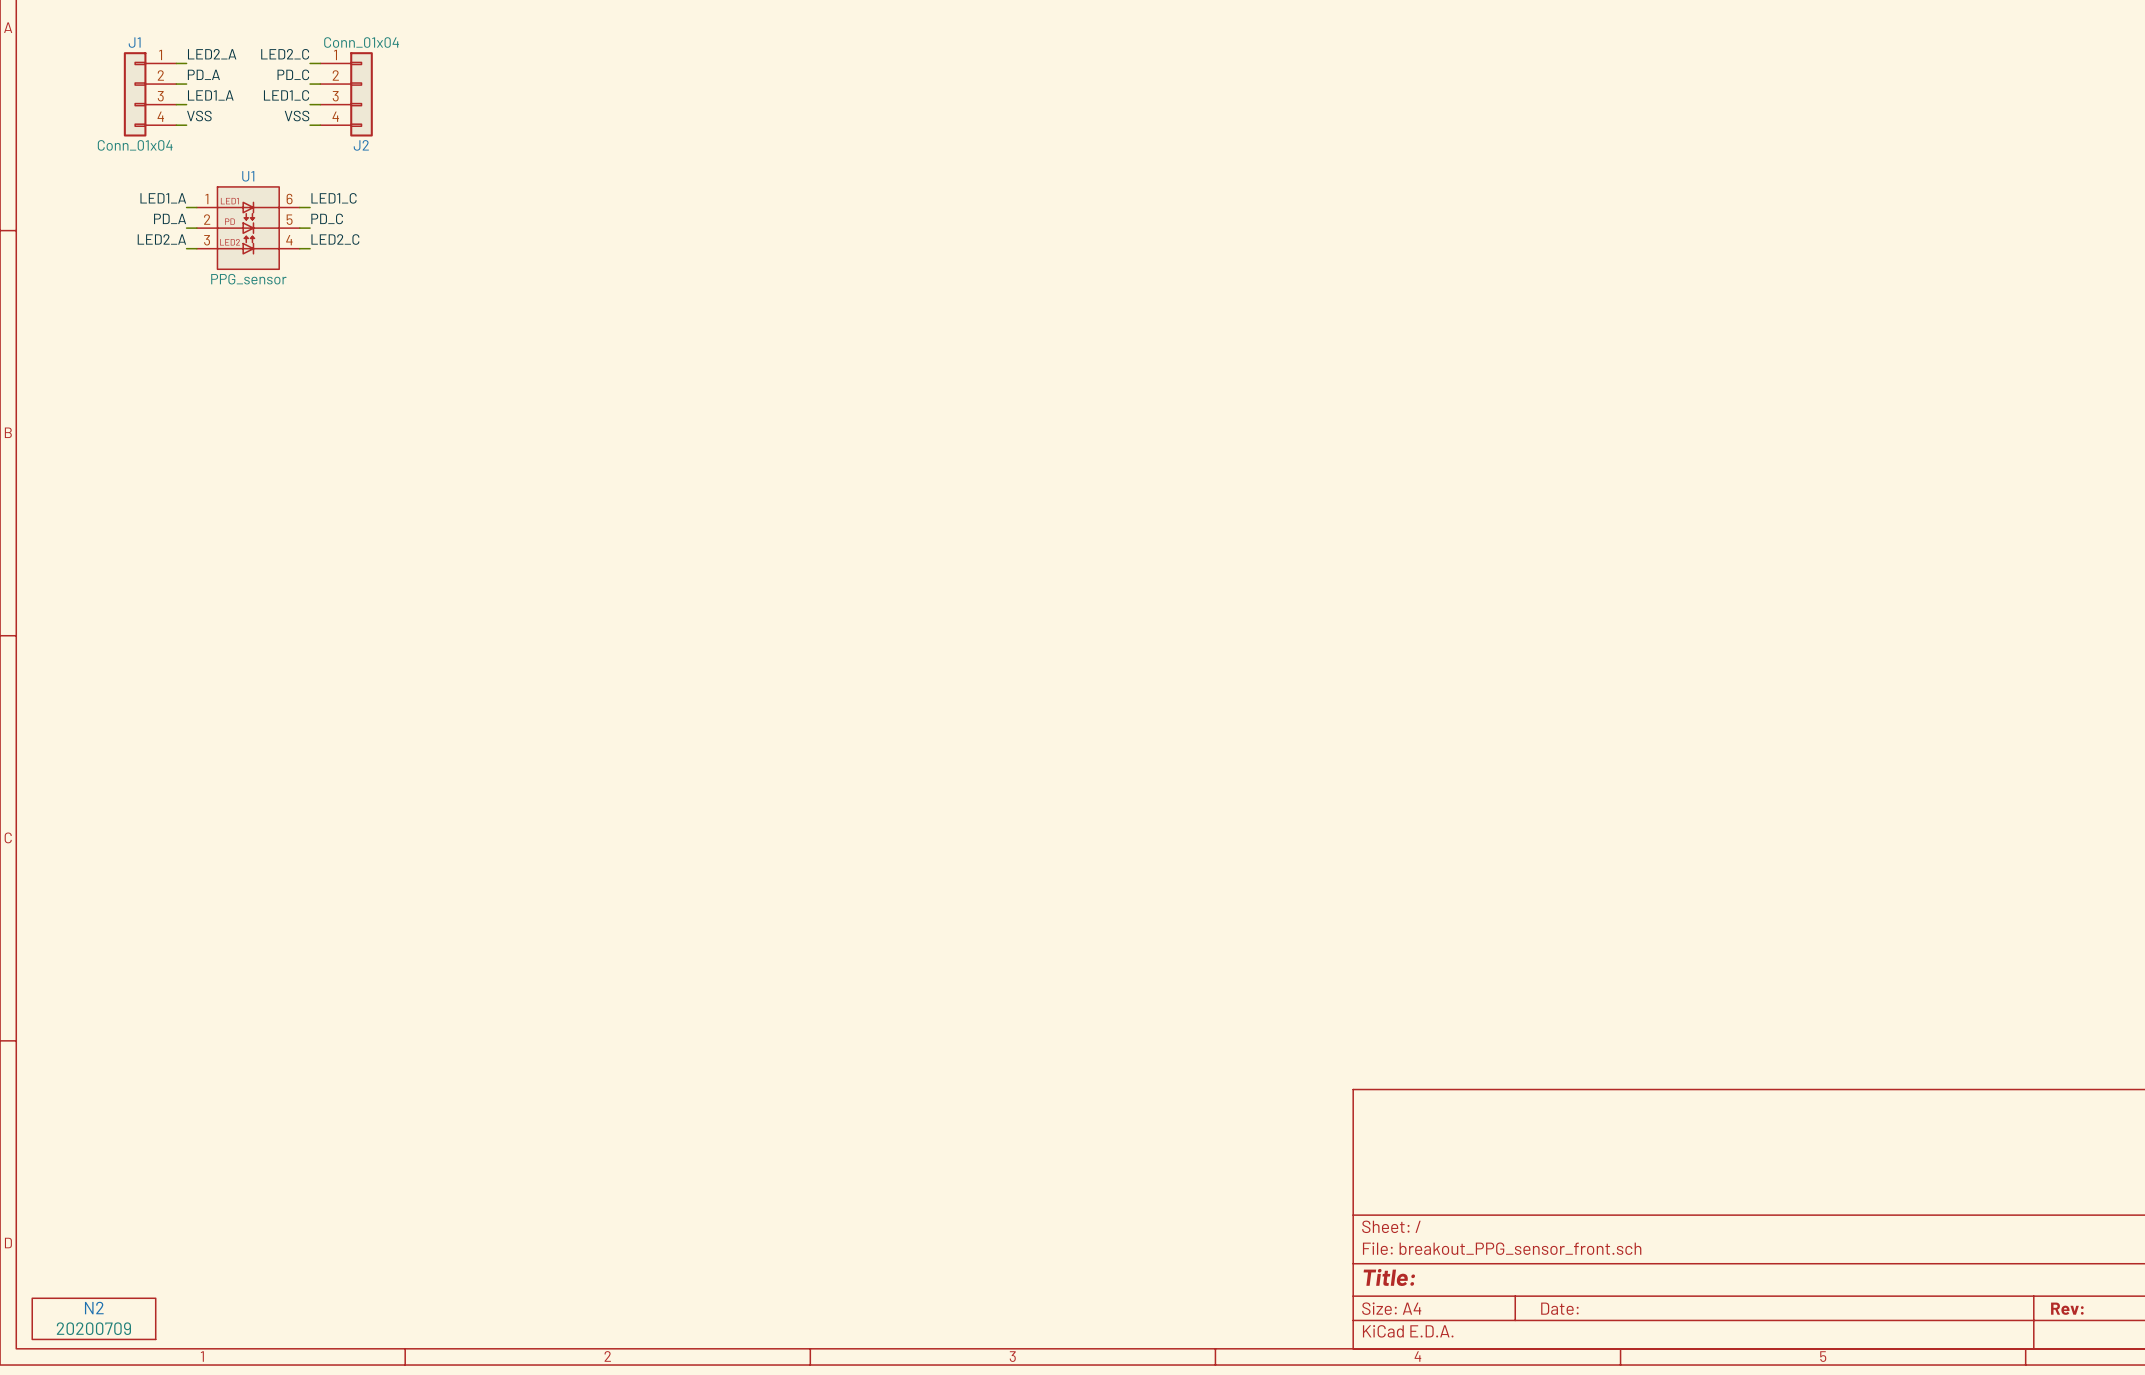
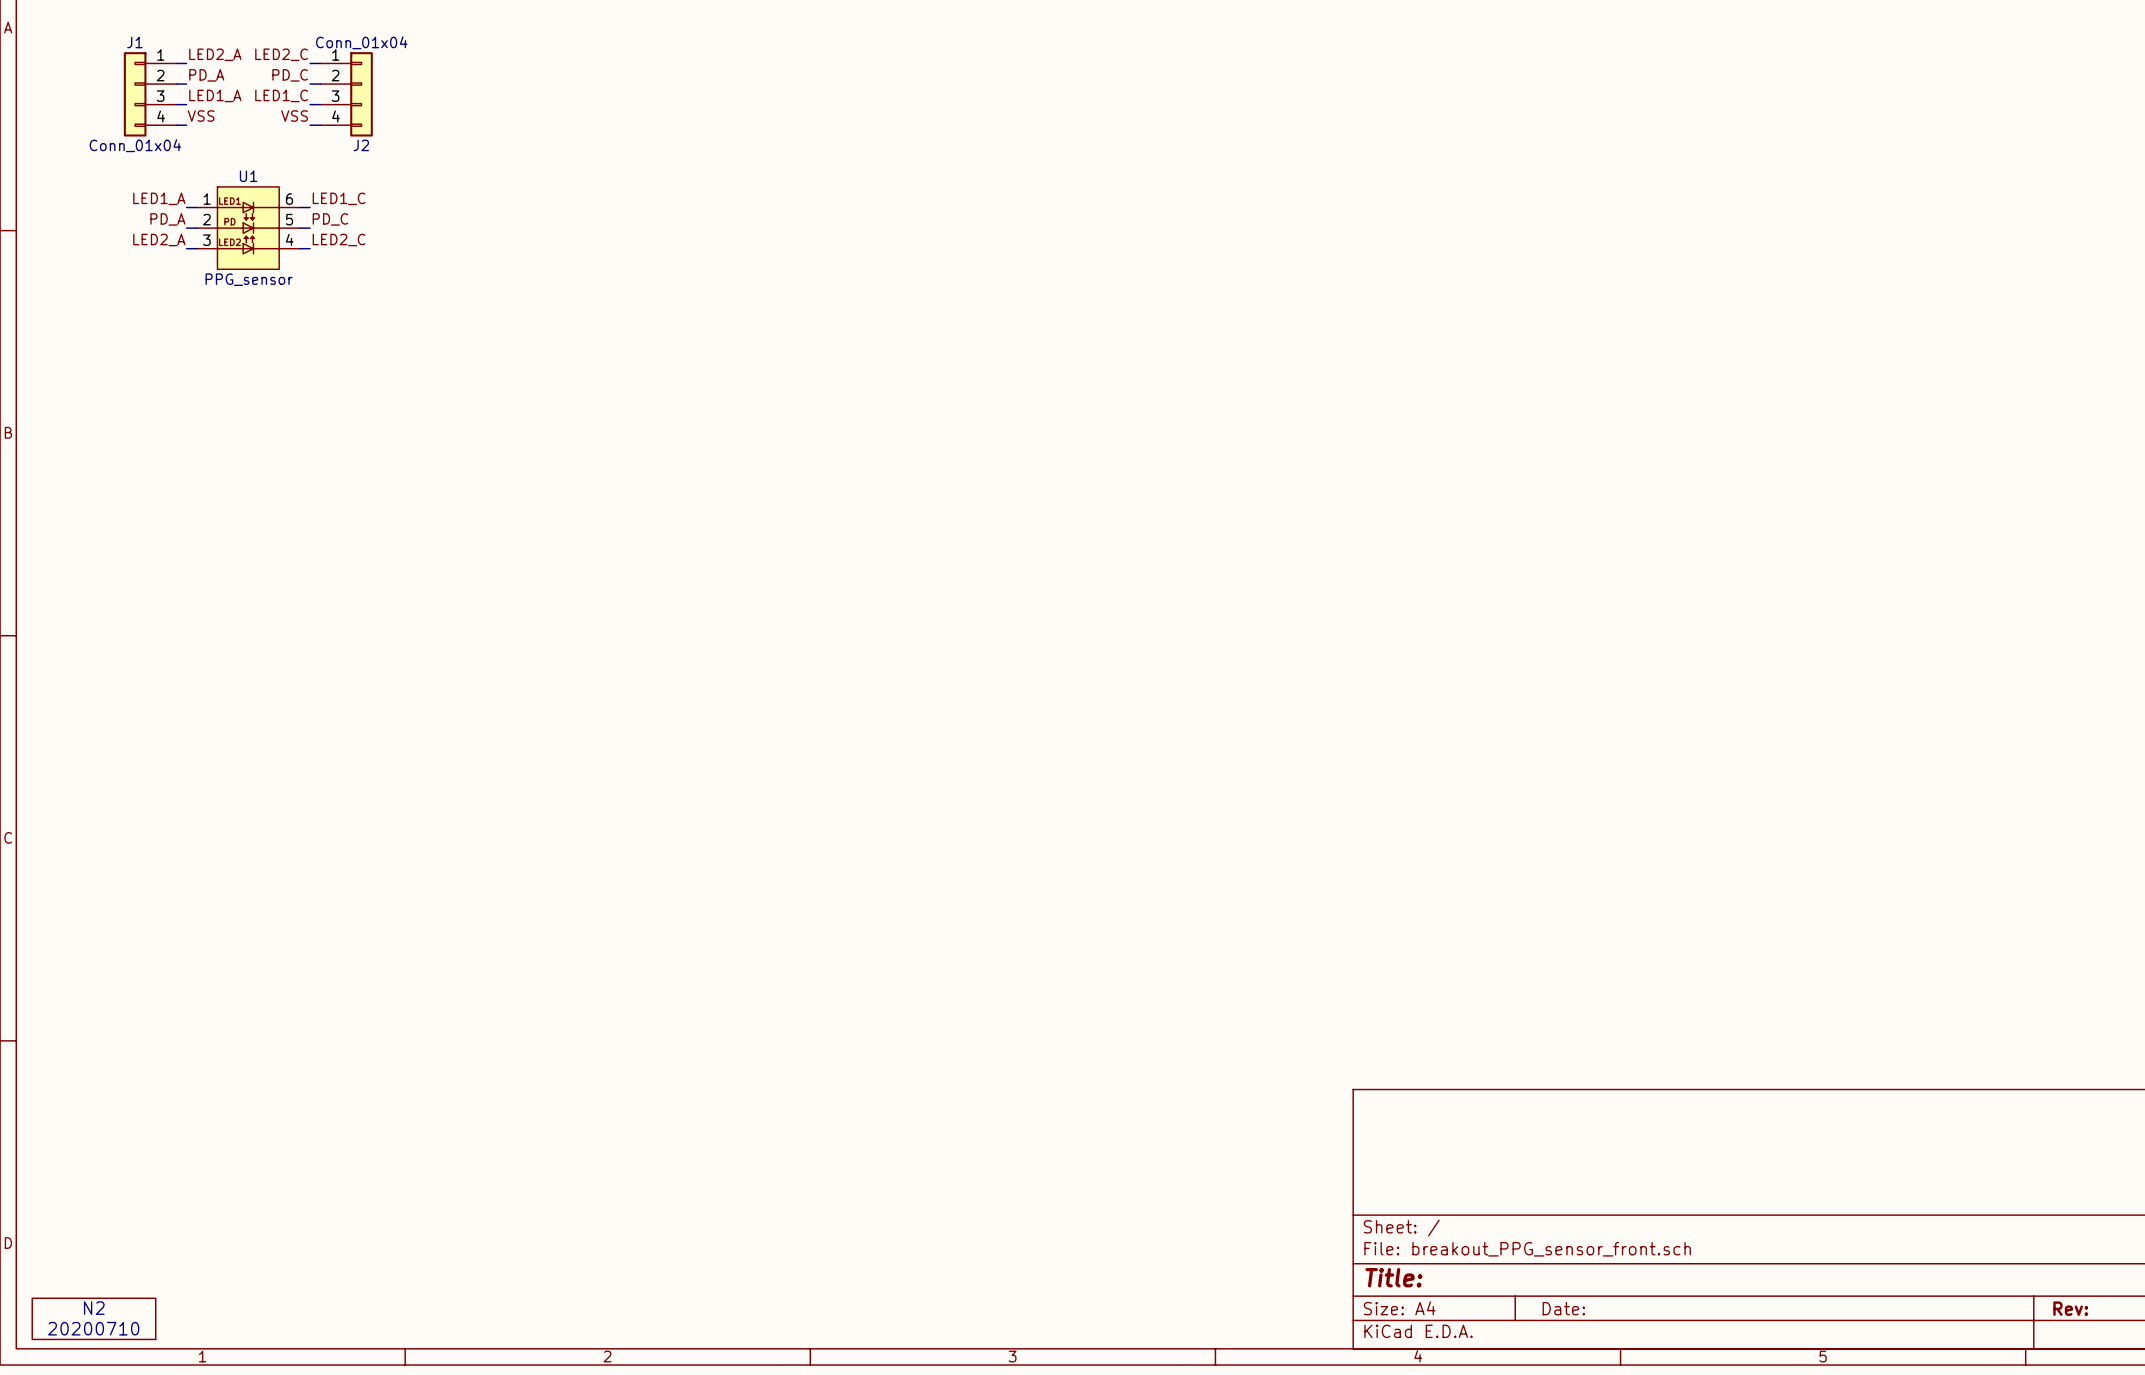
N2 value: 20200709 (93, 1328) -> 20200710 (93, 1328)

